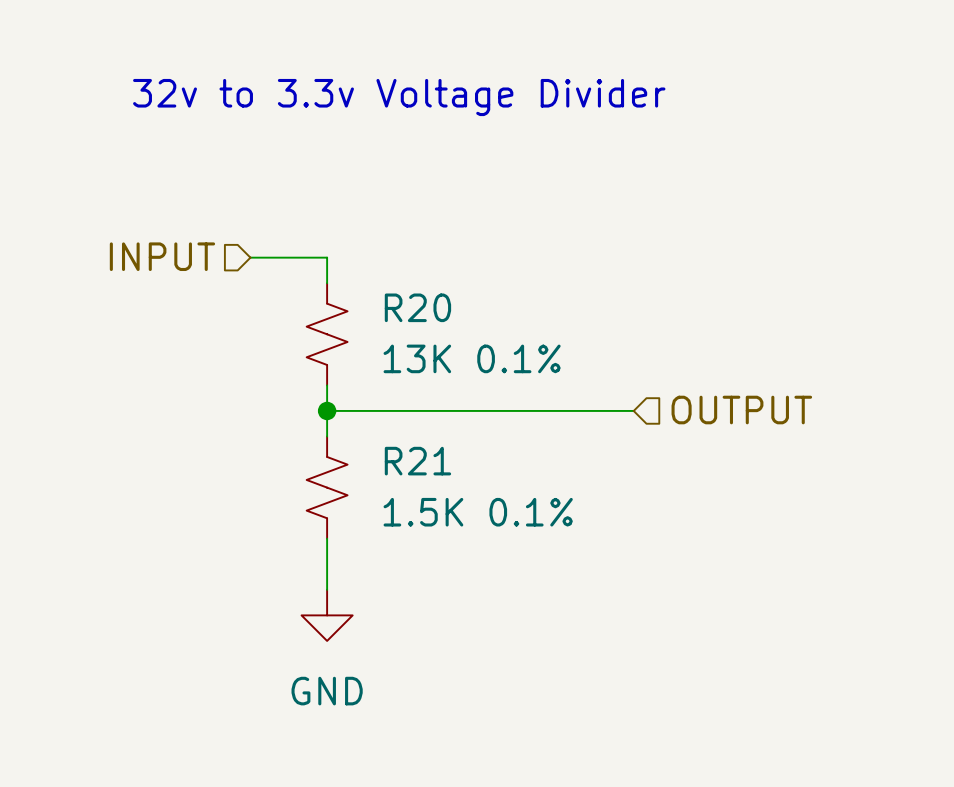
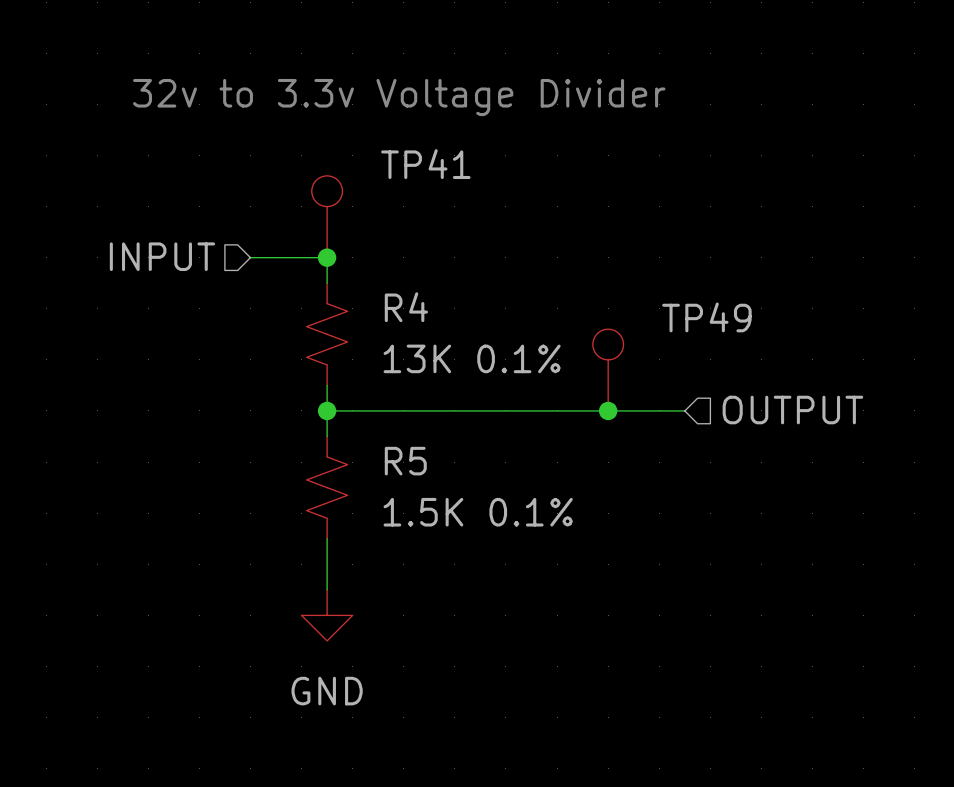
TP41: none -> (327, 216)
junction: none -> (327, 257)
R20 name: R20 (417, 307) -> R4 (406, 307)
TP49: none -> (608, 370)
junction: none -> (608, 410)
wire: none -> (633, 410) (684, 410)
hierarchical label position: OUTPUT (741, 410) -> OUTPUT (792, 410)
R21 name: R21 (417, 461) -> R5 (405, 461)

